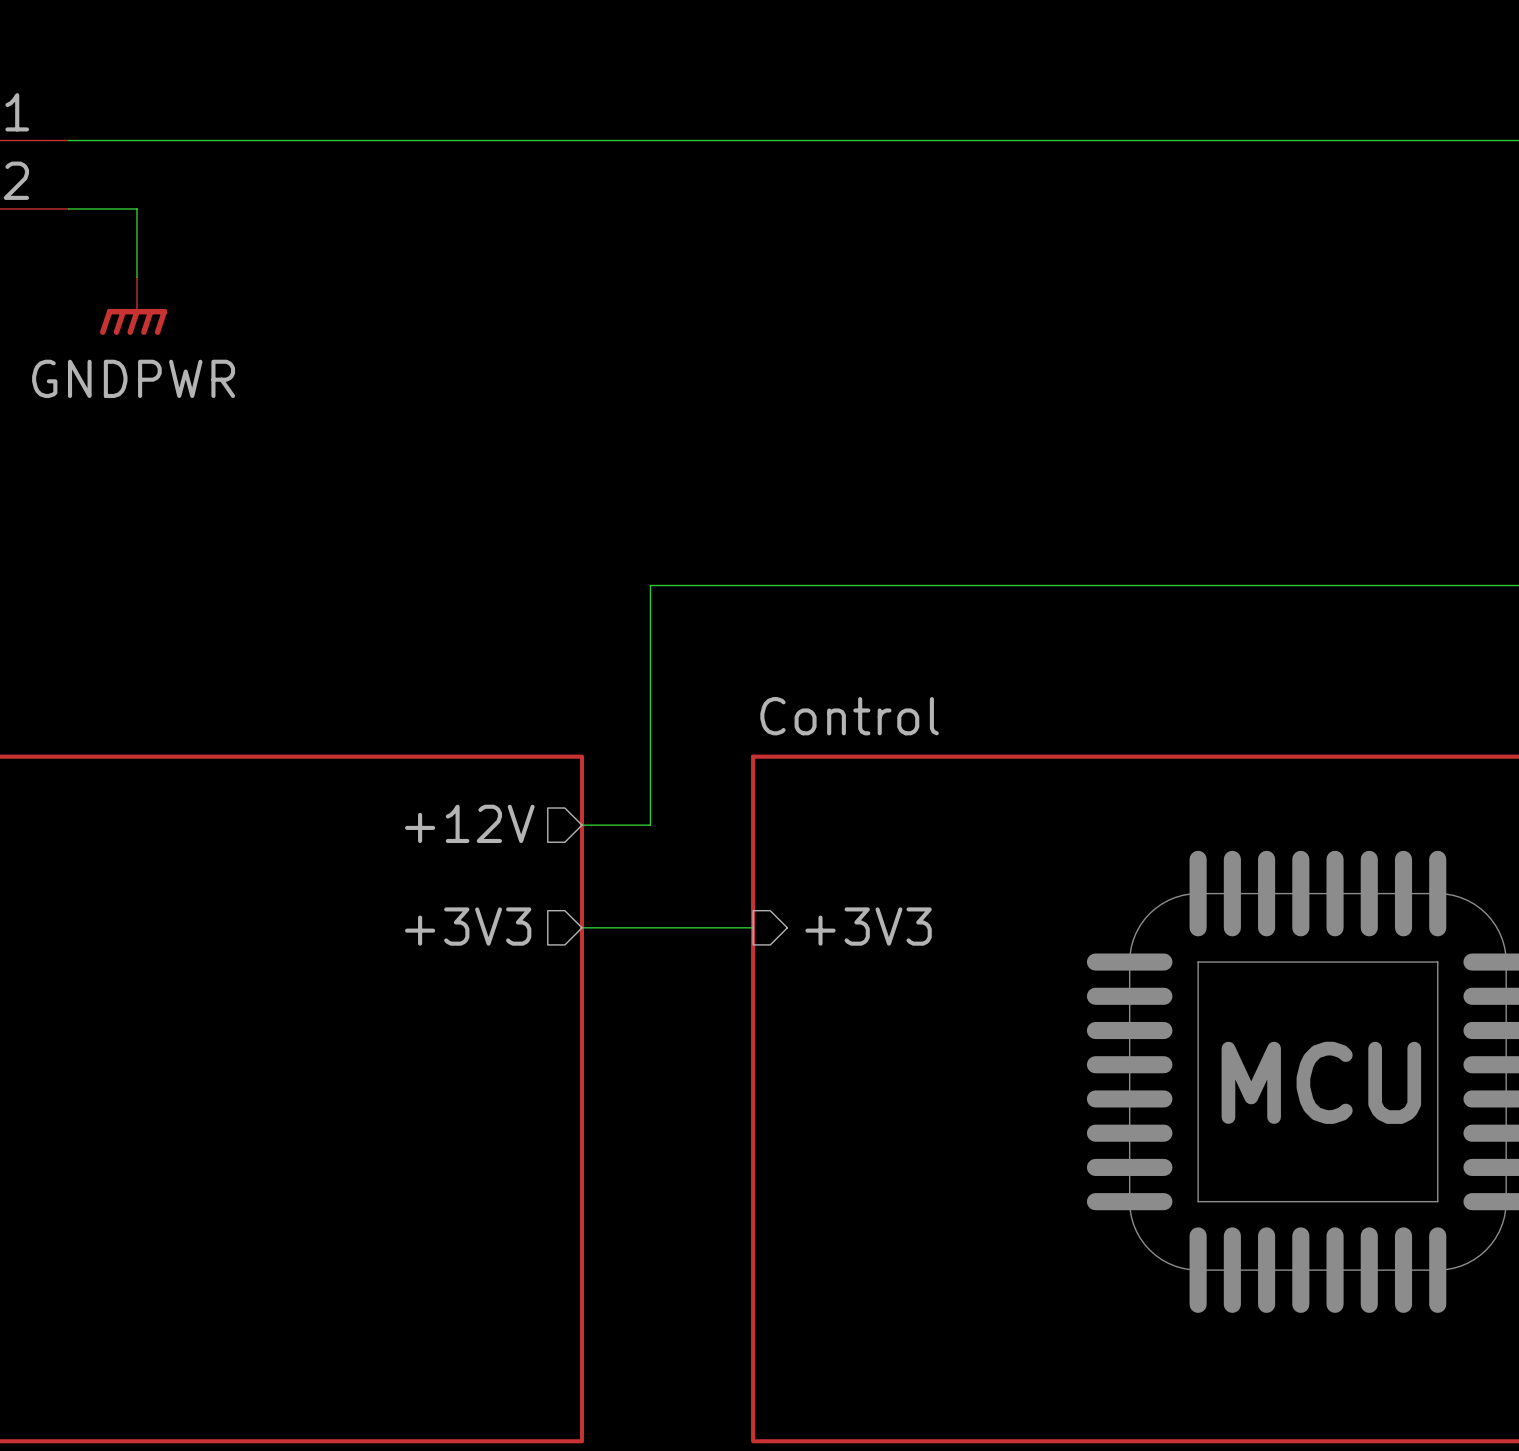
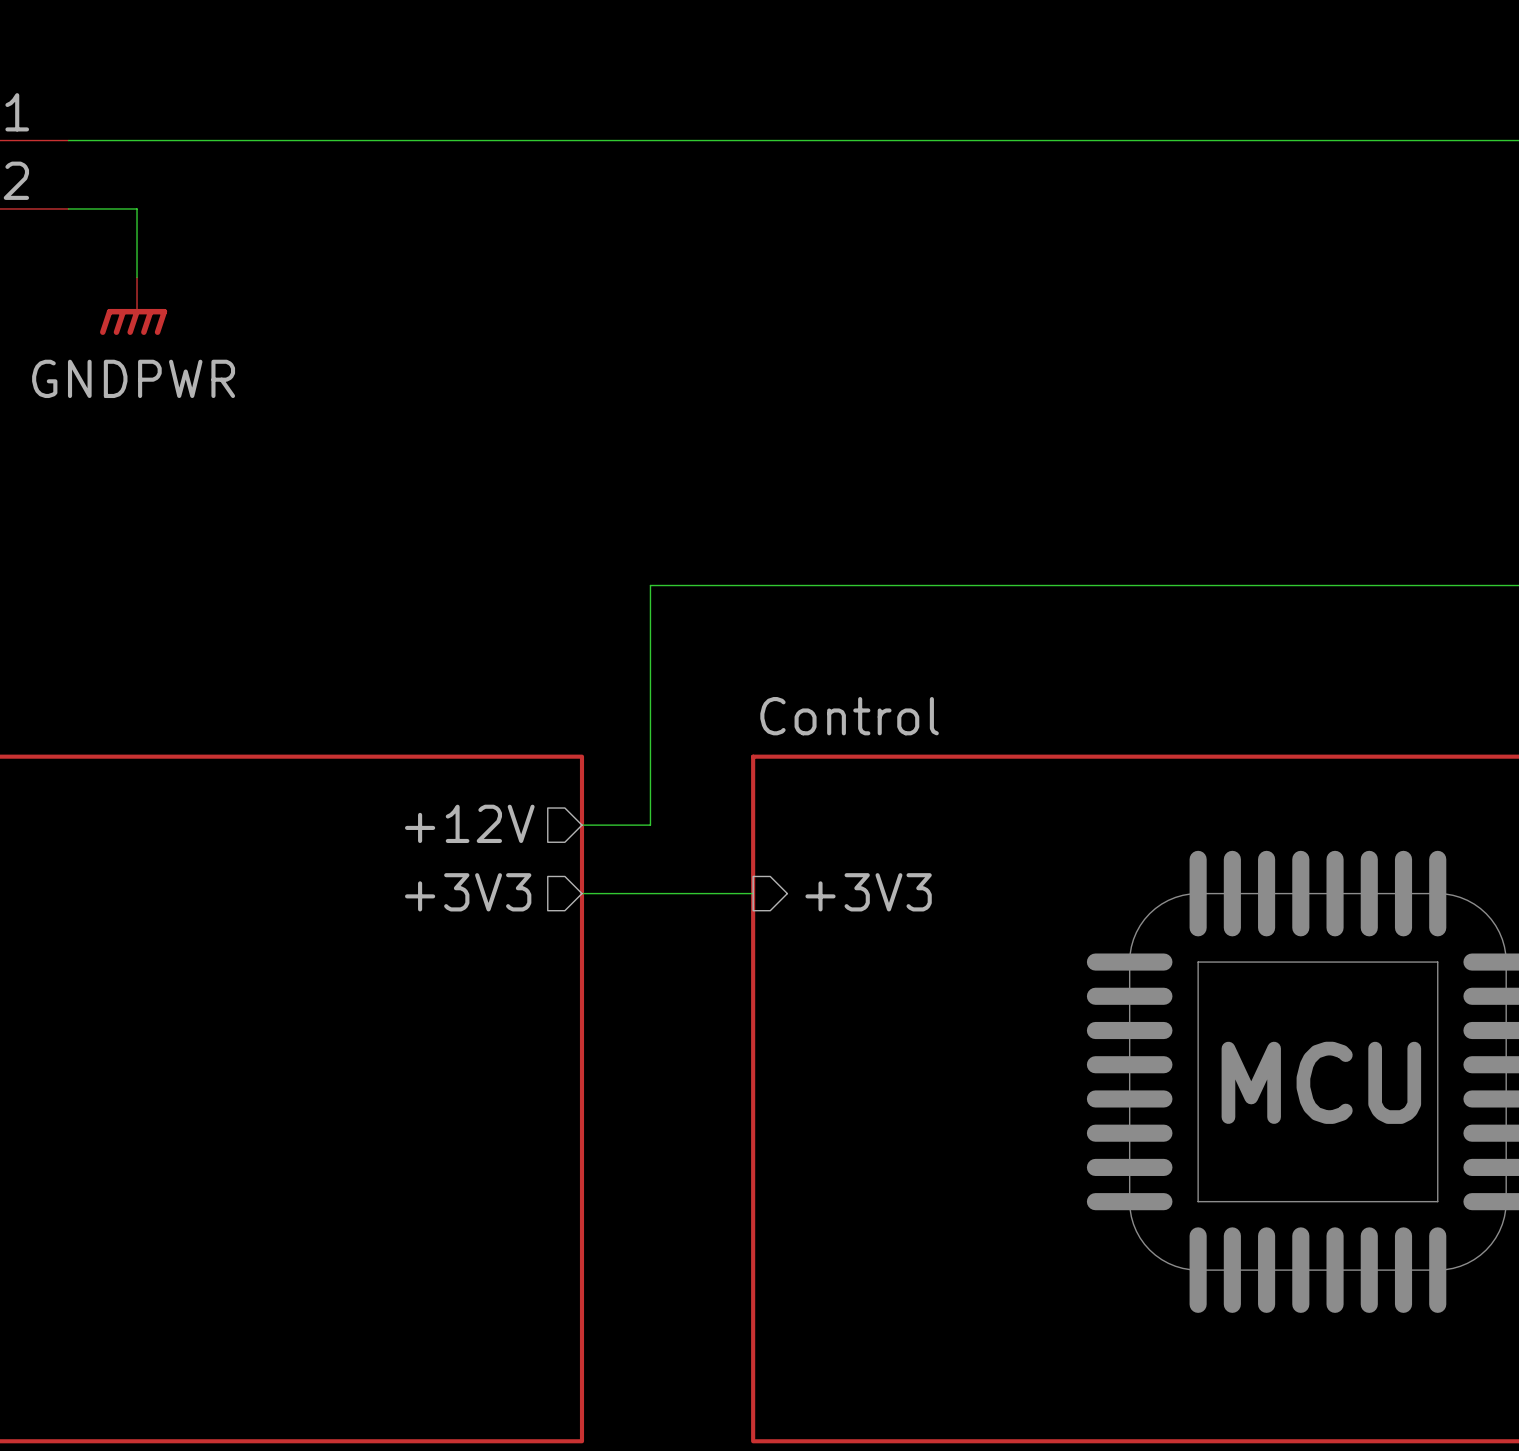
sheet pin position: +3V3 (468, 926) -> +3V3 (468, 892)
sheet pin position: +3V3 (868, 926) -> +3V3 (868, 892)
wire: (582, 927) (753, 927) -> (582, 893) (753, 893)

